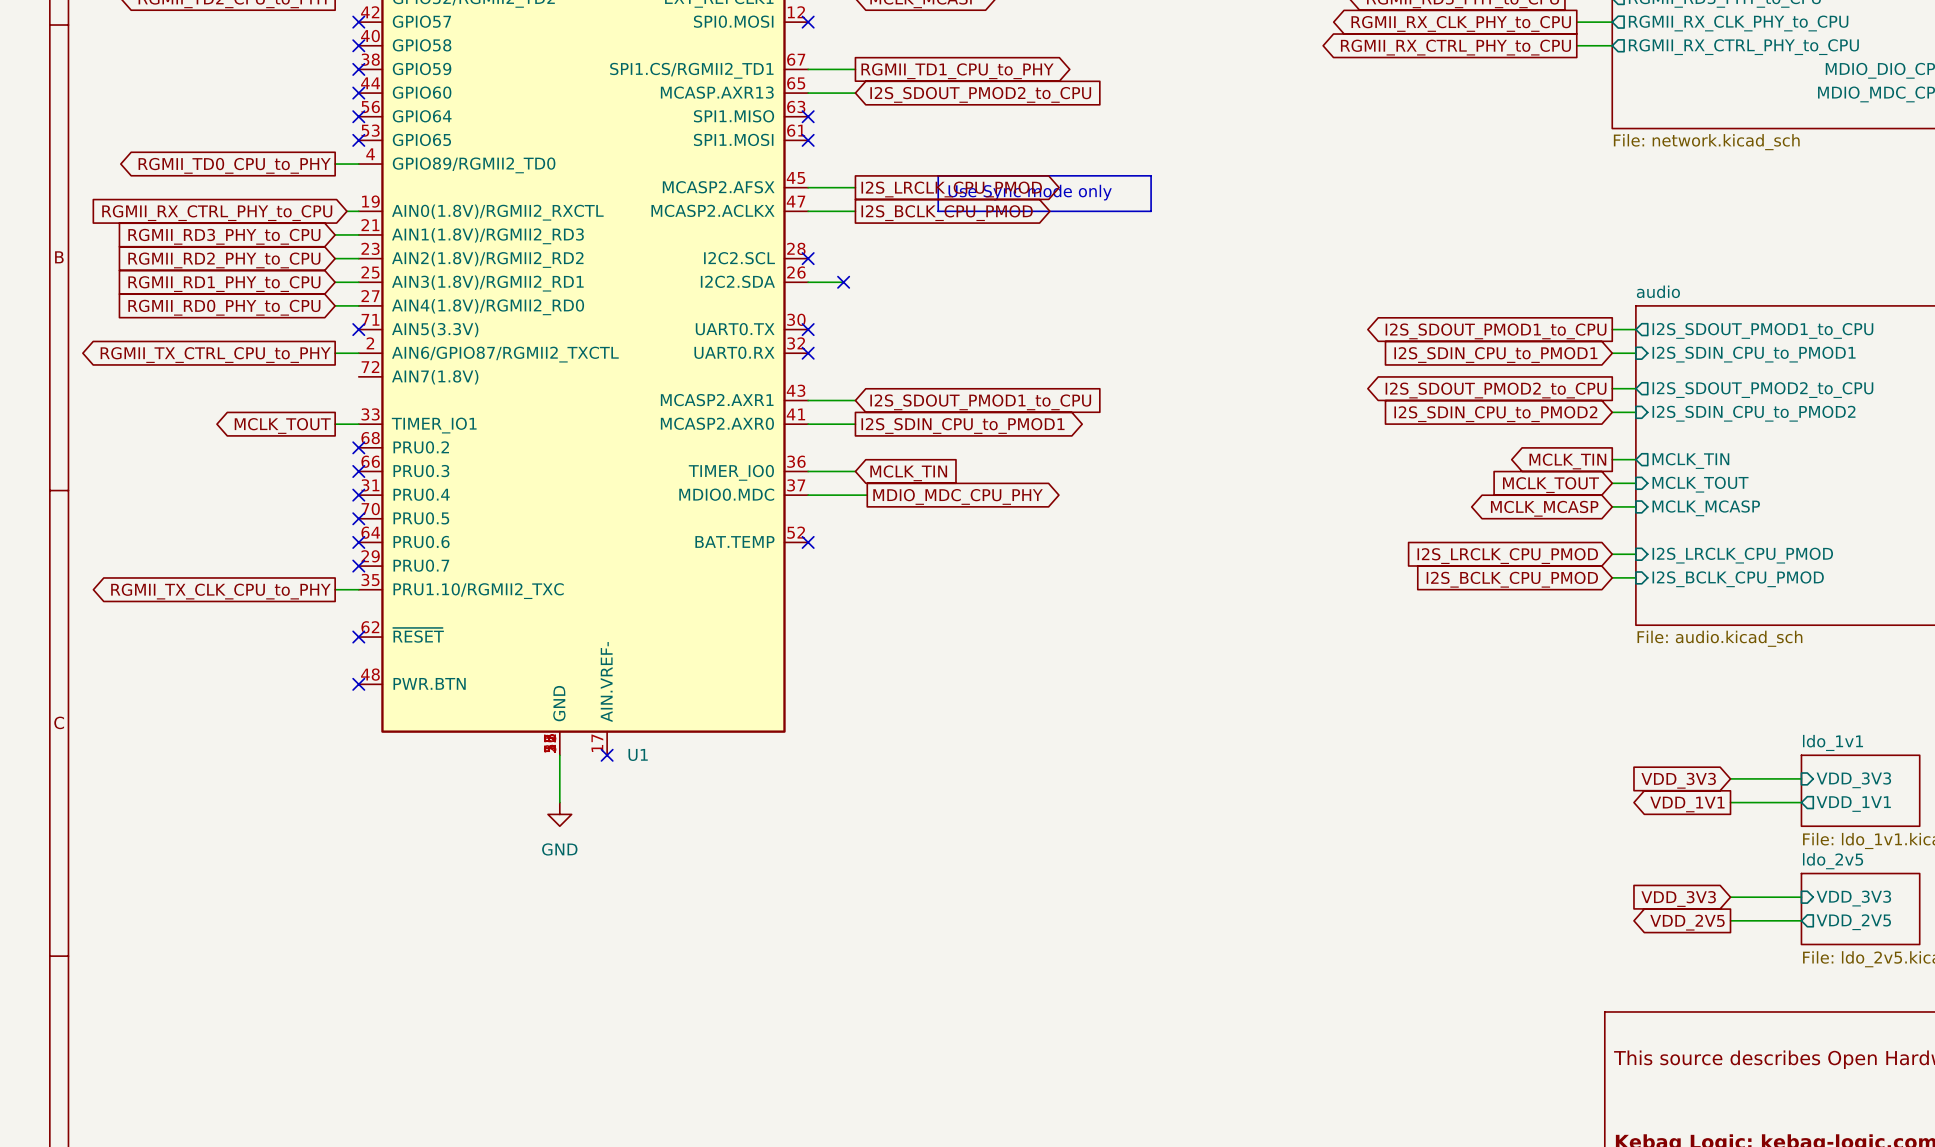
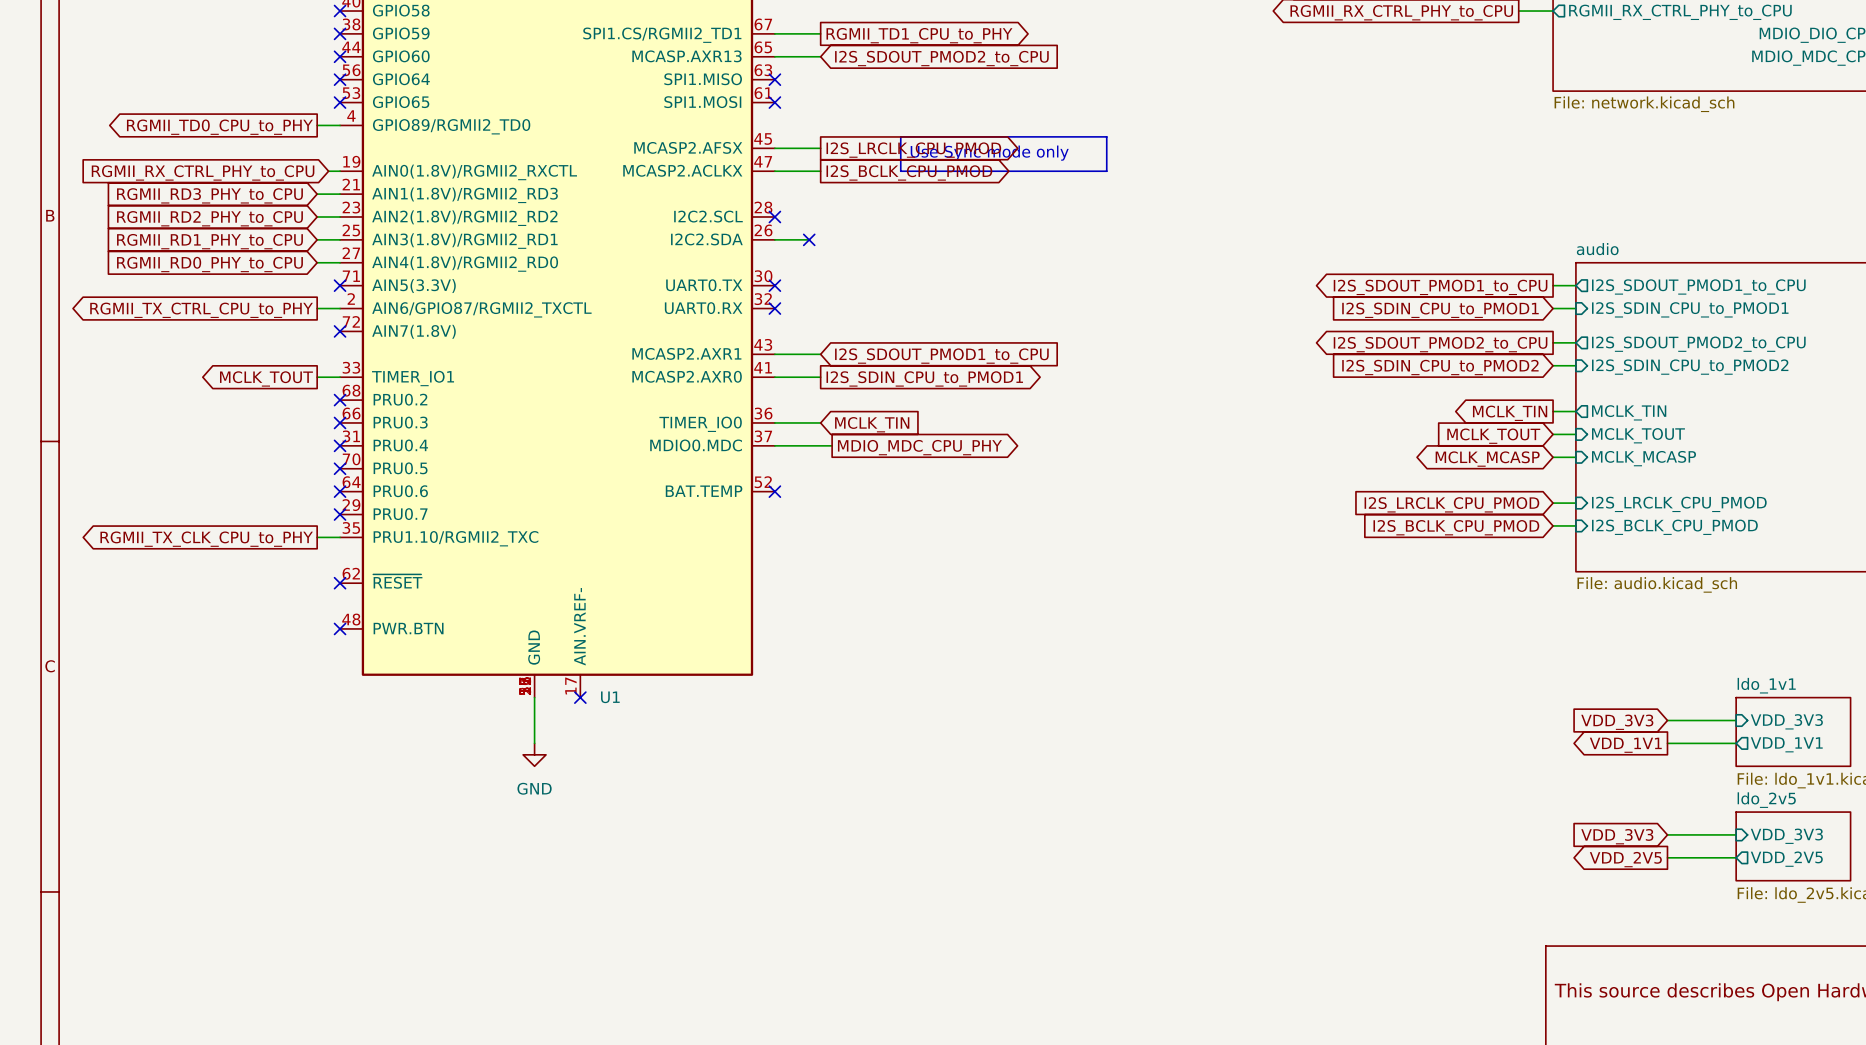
no-connect mark: none -> (340, 331)

